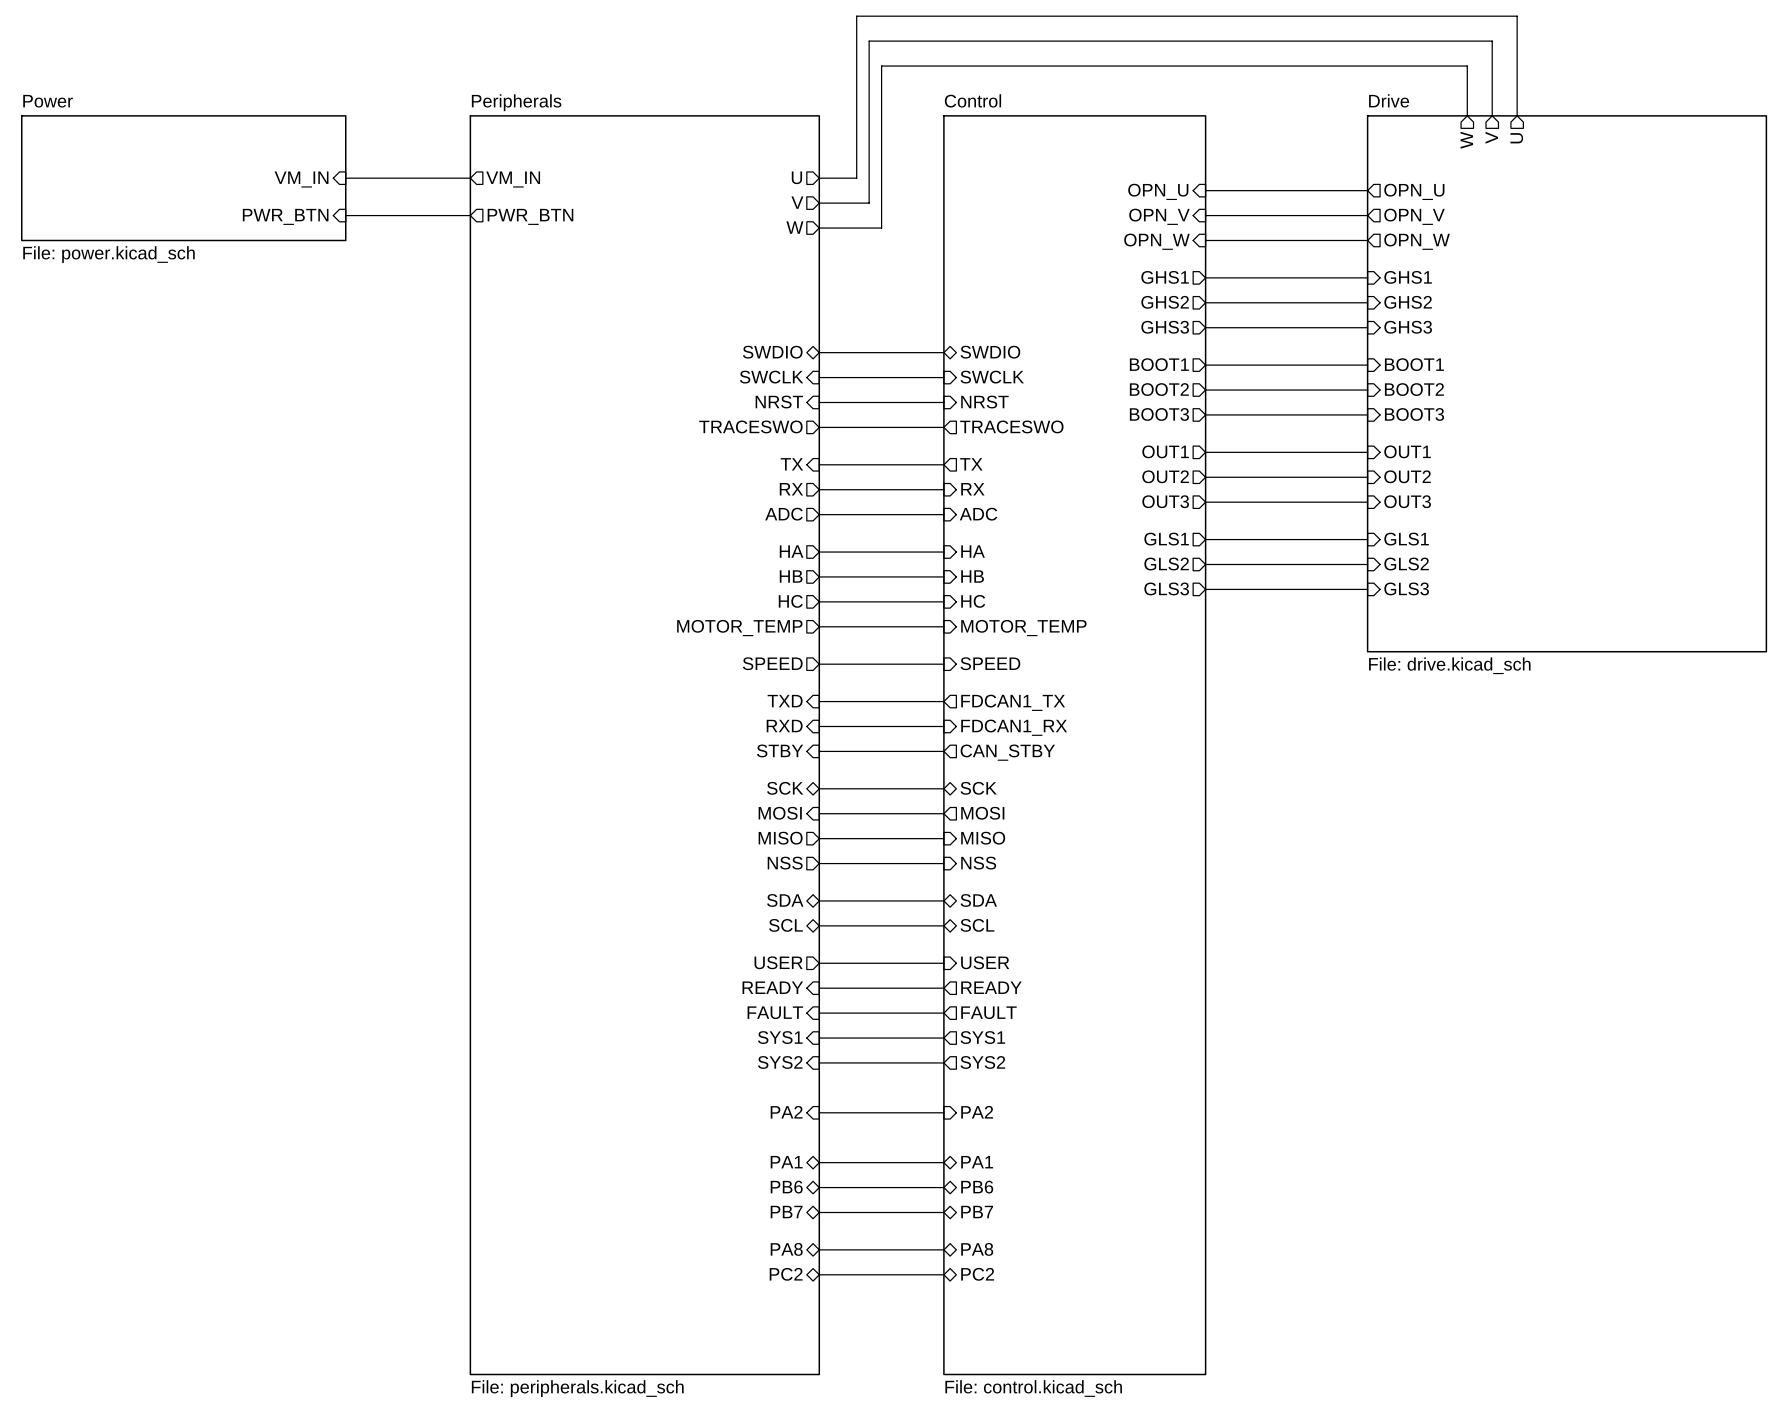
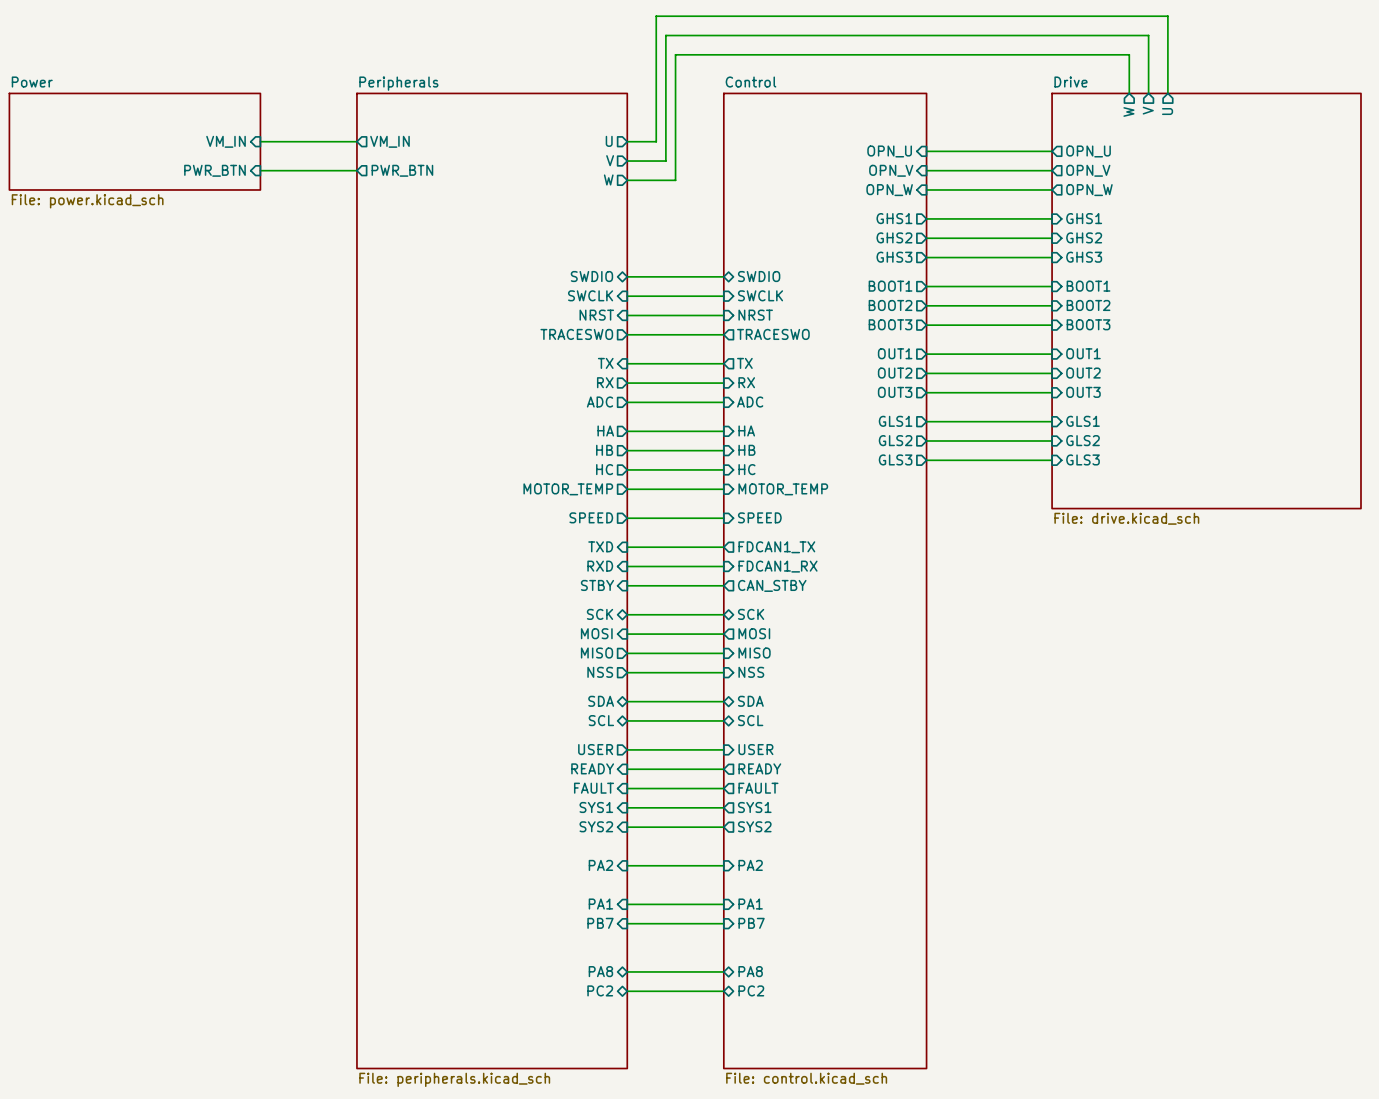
sheet pin shape: bidirectional (786, 1162) -> input (600, 904)
sheet pin shape: bidirectional (977, 1162) -> input (750, 904)
sheet pin shape: bidirectional (786, 1187) -> input (600, 923)
sheet pin: PB6 (786, 1187) -> PB7 (600, 923)
sheet pin shape: bidirectional (977, 1187) -> input (751, 923)
sheet pin: PB6 (977, 1187) -> PB7 (751, 923)
sheet pin: PB7 (786, 1212) -> none
wire: (819, 1212) (943, 1212) -> none
sheet pin: PB7 (977, 1212) -> none

